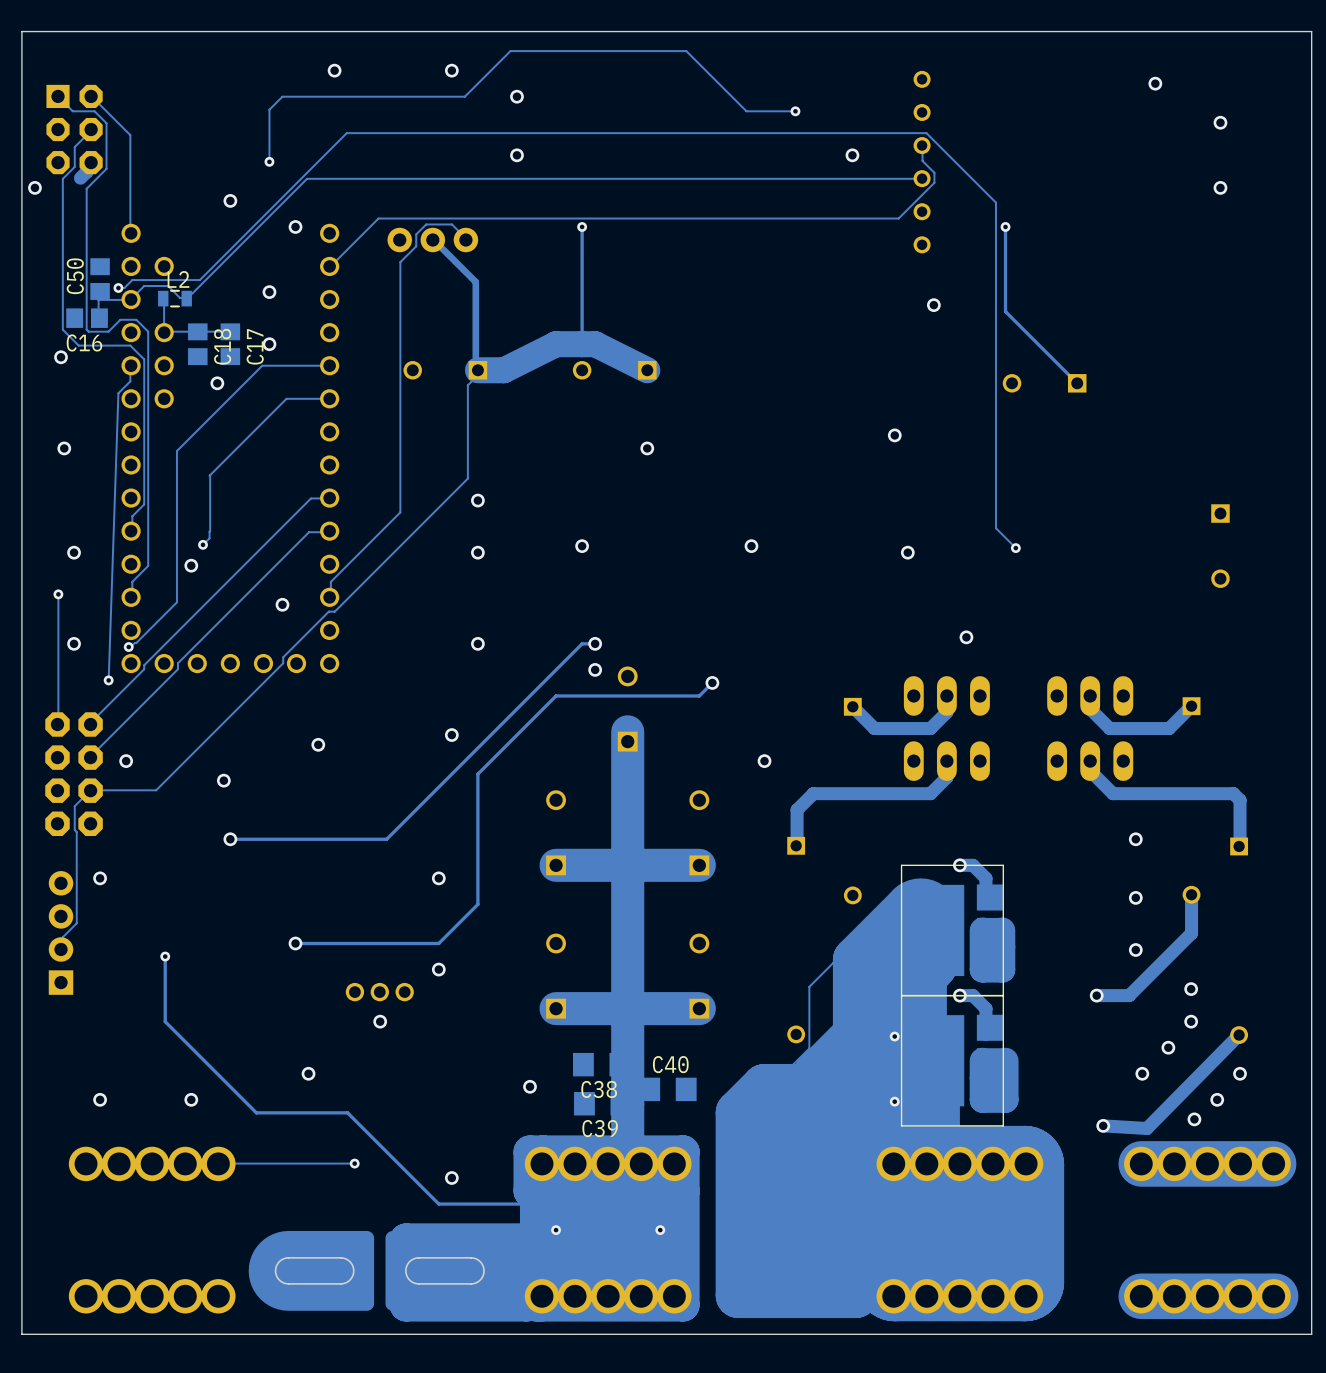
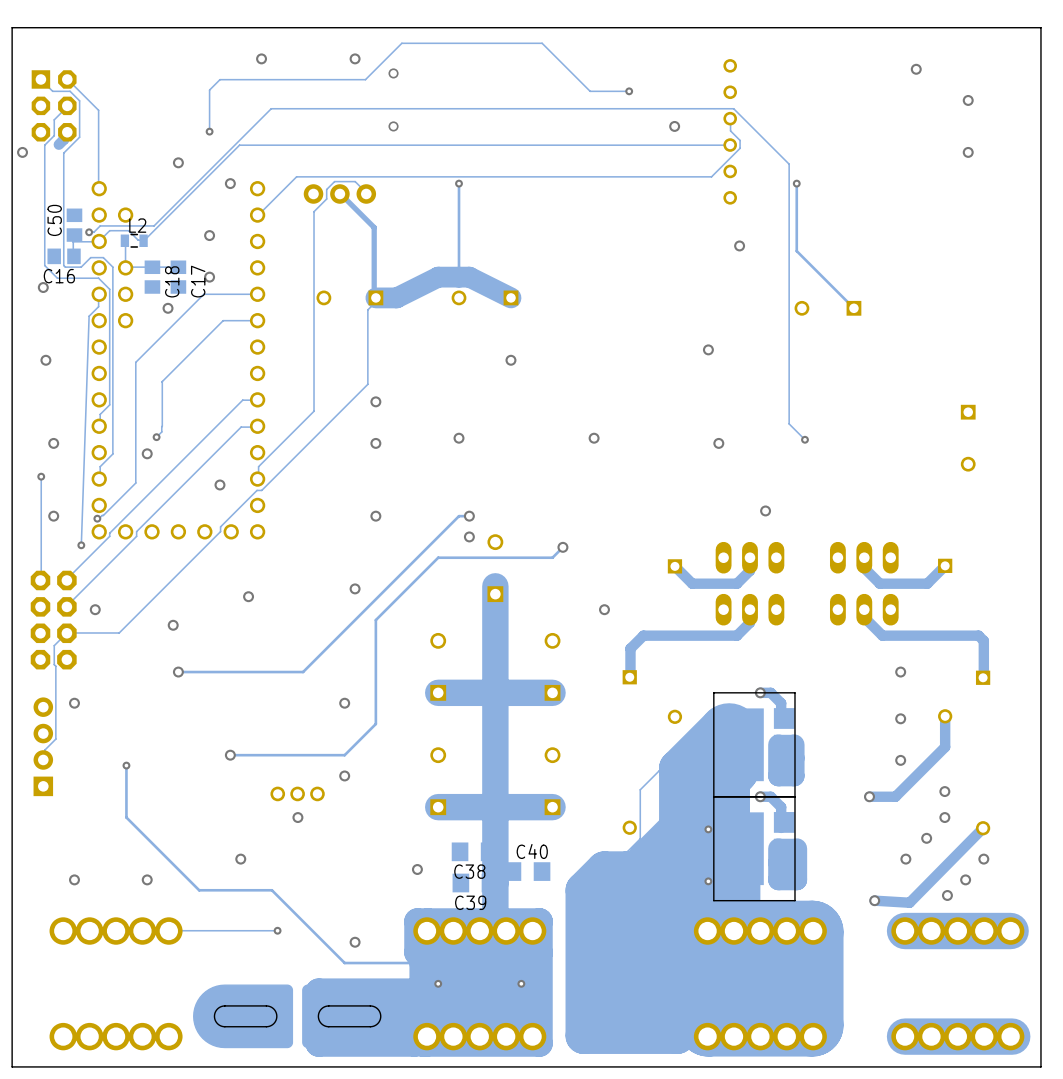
via: none -> (393, 73)
via: (516, 96) -> none
via: none -> (393, 126)
via: (516, 155) -> none

